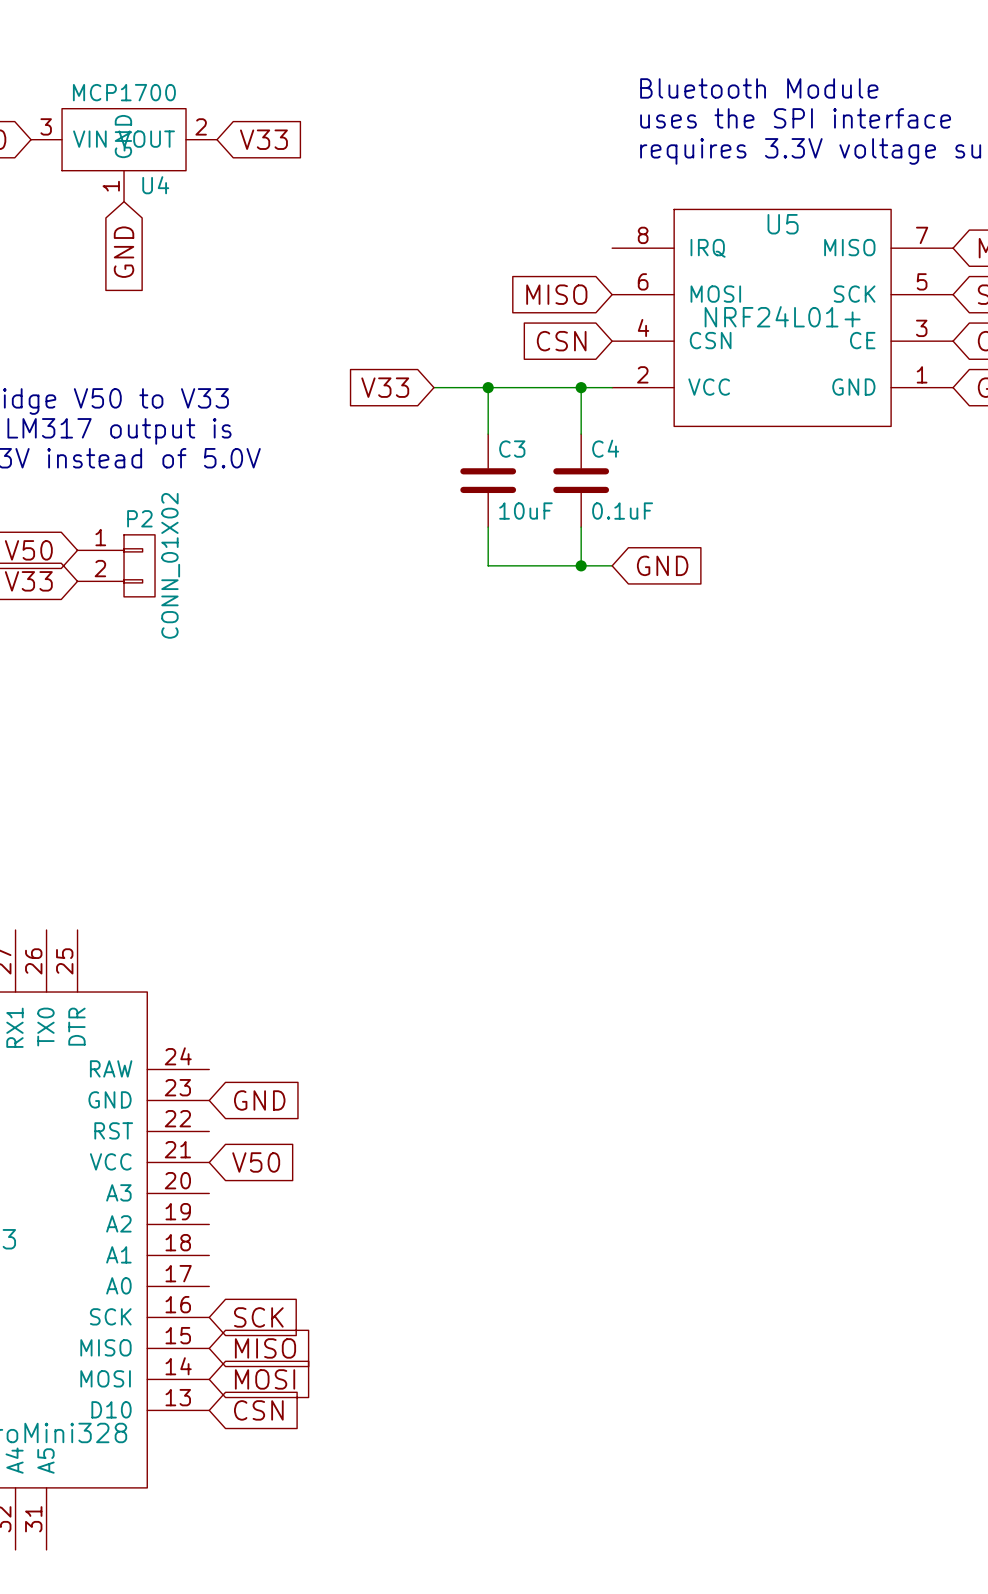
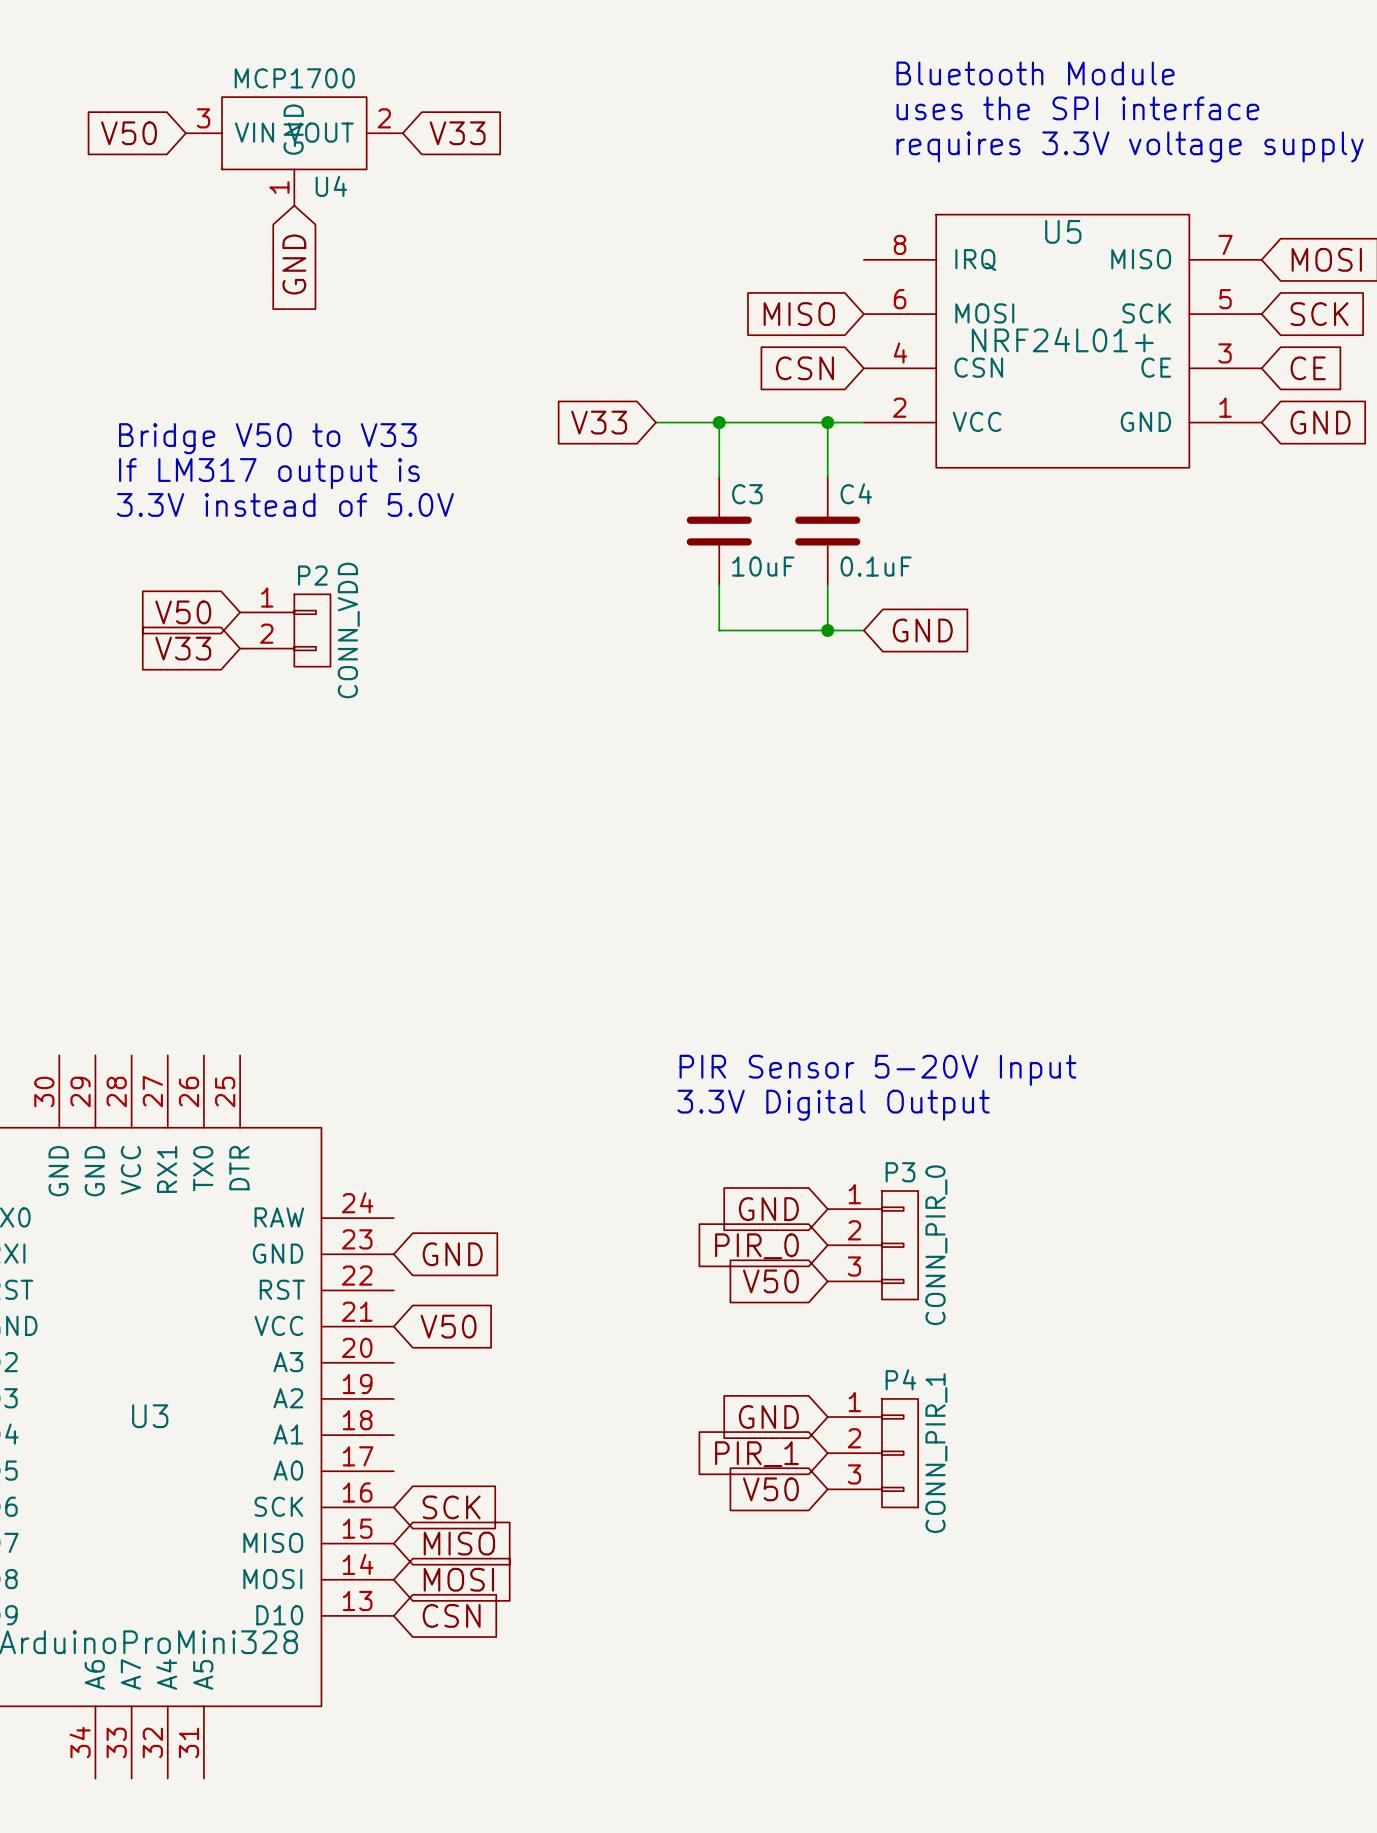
P2 value: CONN_01X02 (170, 565) -> CONN_VDD (348, 630)
text: none -> PIR Sensor 5-20V Input (877, 1070)
text: none -> 3.3V Digital Output (833, 1105)
global label: none -> GND (768, 1209)
P3: none -> CONN_PIR_0 (872, 1245)
global label: none -> PIR_0 (756, 1246)
global label: none -> V50 (770, 1281)
global label: none -> GND (768, 1417)
P4: none -> CONN_PIR_1 (872, 1453)
global label: none -> PIR_1 (756, 1454)
global label: none -> V50 (770, 1489)

